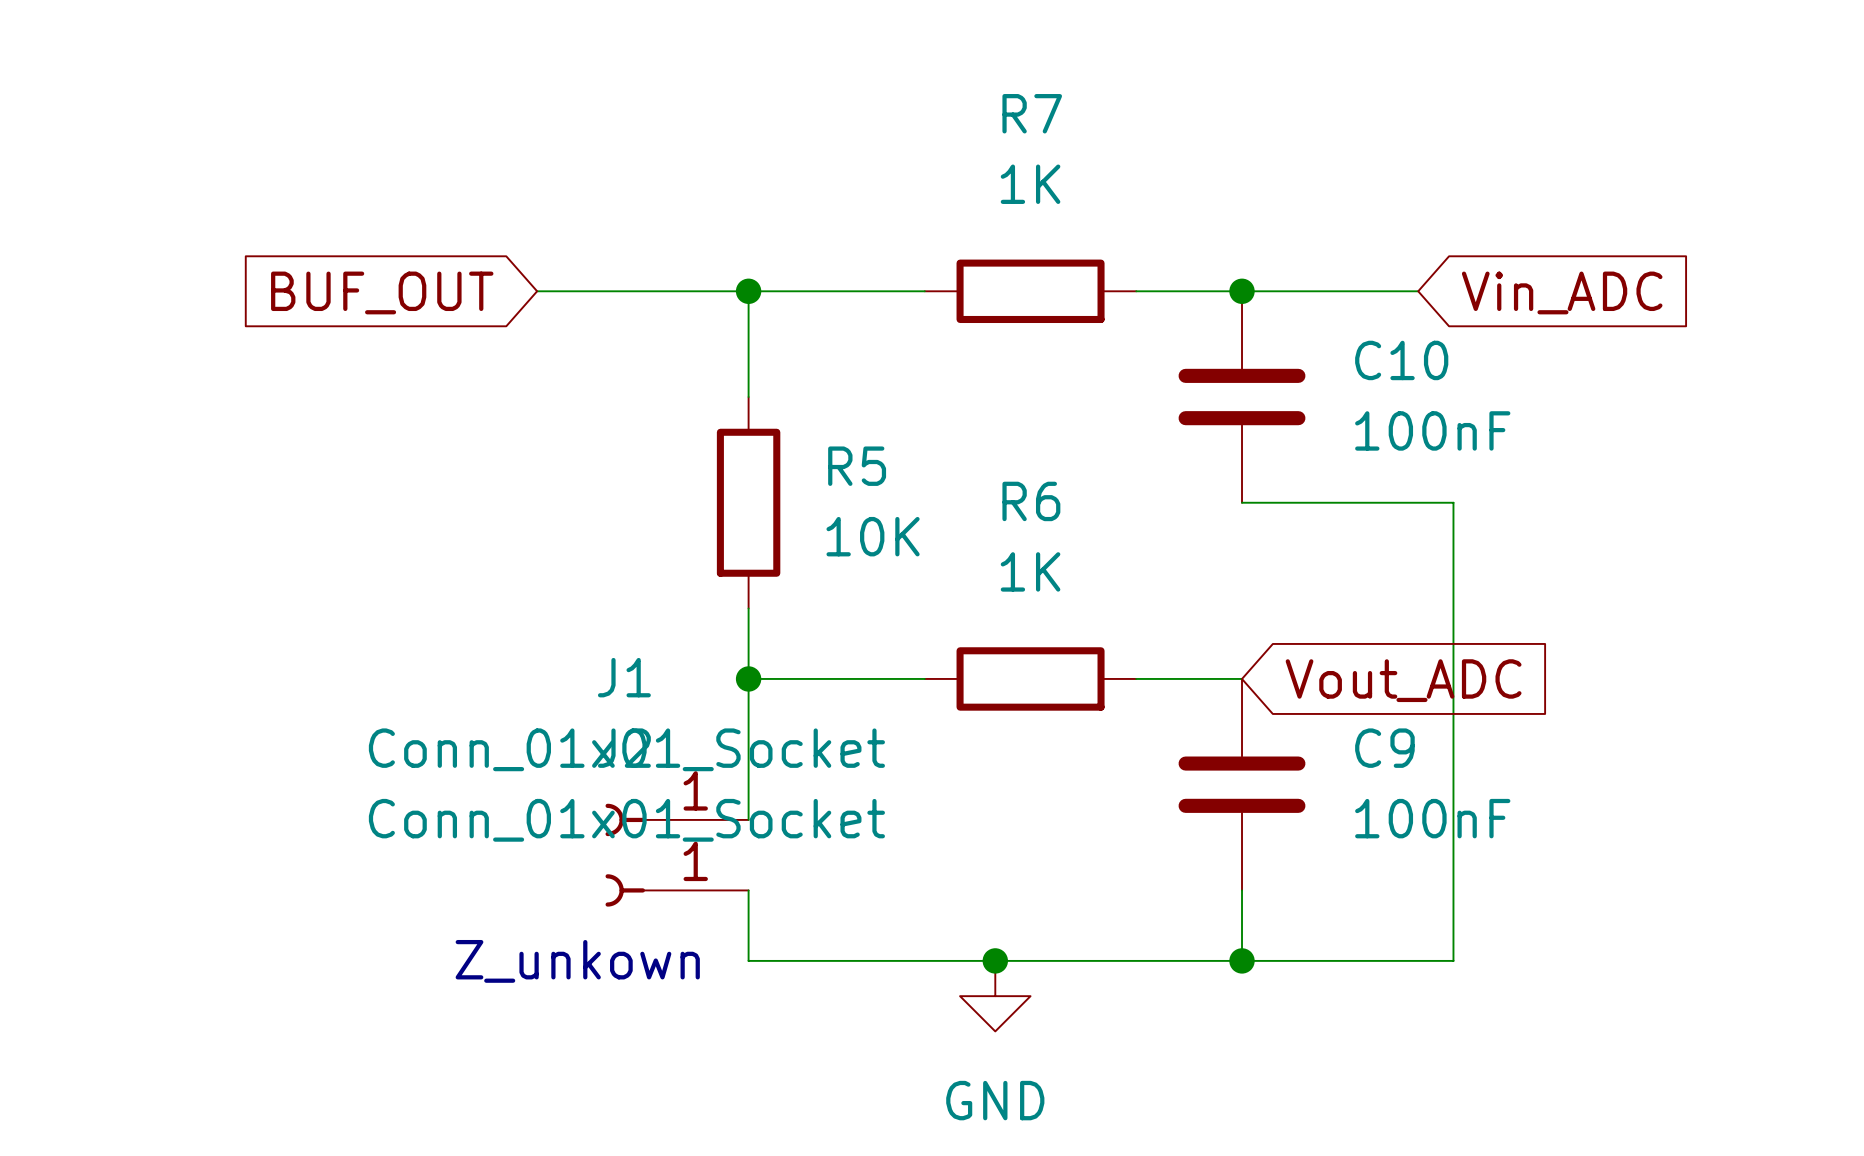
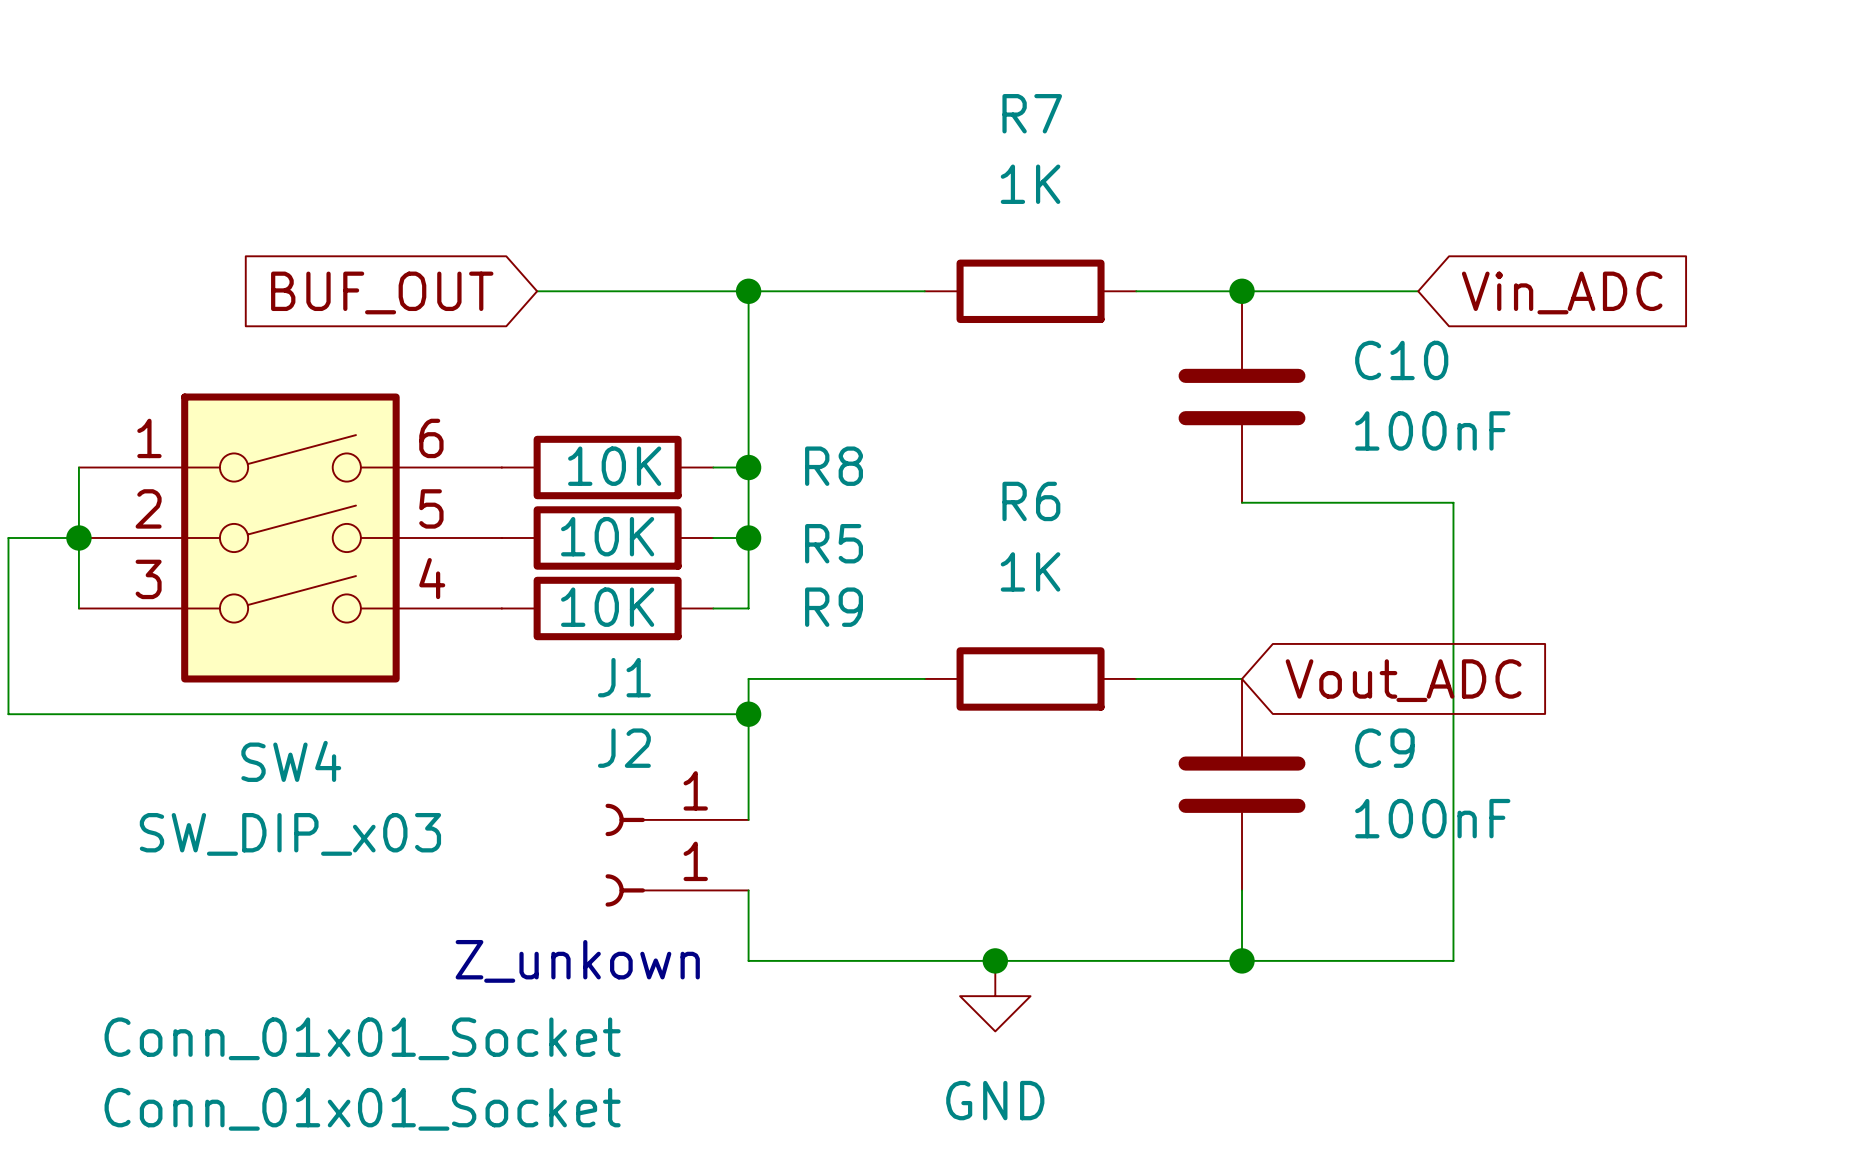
wire: none -> (748, 397) (748, 608) (713, 608)
R5 name position: R5 (857, 466) -> R5 (834, 543)
wire: none -> (78, 467) (78, 608)
R8: none -> 10K (607, 467)
wire: none -> (713, 467) (748, 467)
junction: none -> (748, 467)
R5 rotation: 0° (748, 502) -> 90° clockwise (607, 537)
R5 position: (748, 502) -> (607, 537)
R5 value position: 10K (873, 536) -> 10K (607, 536)
wire: none -> (78, 537) (8, 537) (8, 714) (748, 714)
junction: none -> (78, 537)
SW4: none -> SW_DIP_x03 (290, 537)
wire: none -> (713, 537) (748, 537)
junction: none -> (748, 537)
R9: none -> 10K (607, 608)
wire: (748, 608) (748, 678) -> none
junction position: (748, 678) -> (748, 714)
J1 value position: Conn_01x01_Socket (626, 749) -> Conn_01x01_Socket (362, 1038)
J2 value position: Conn_01x01_Socket (626, 820) -> Conn_01x01_Socket (362, 1109)

